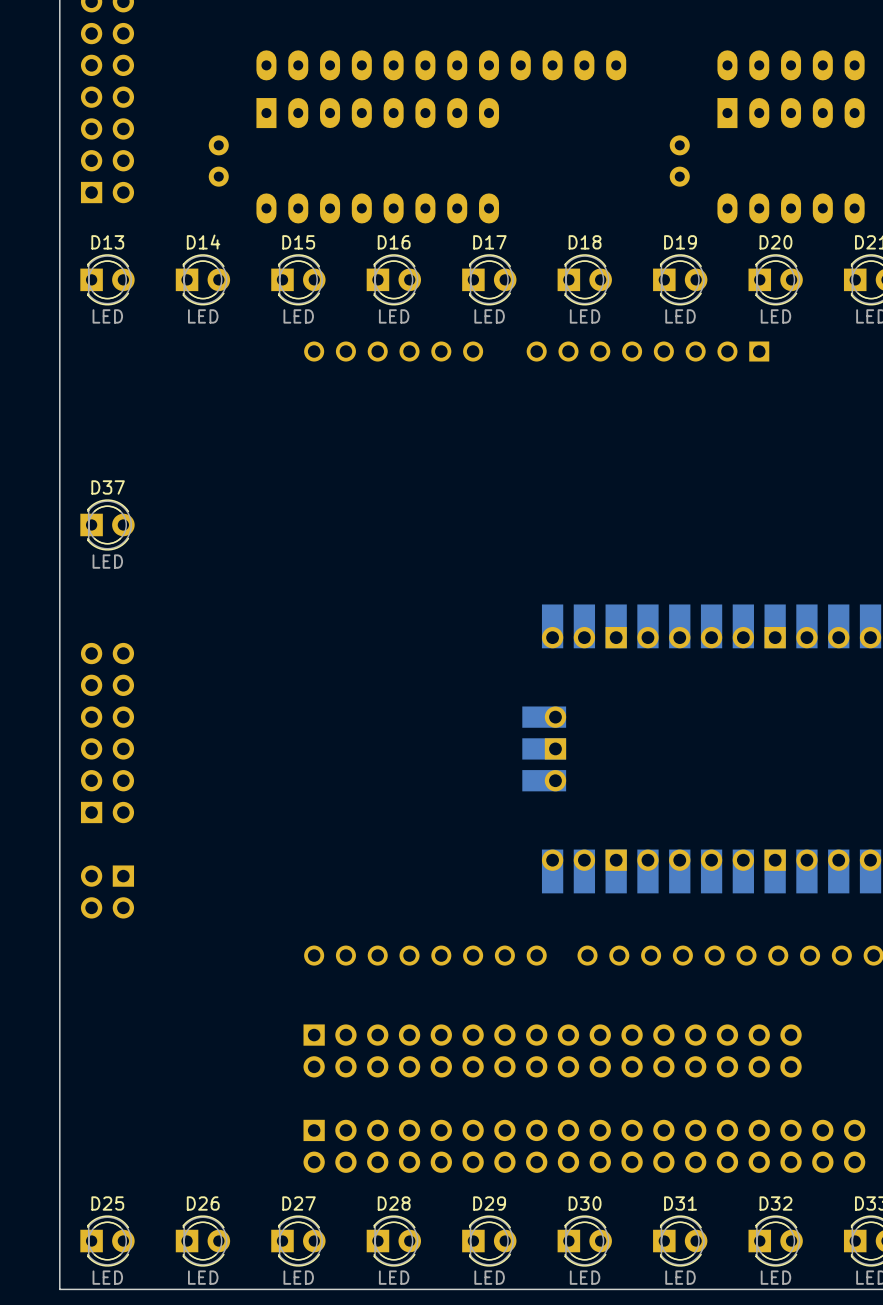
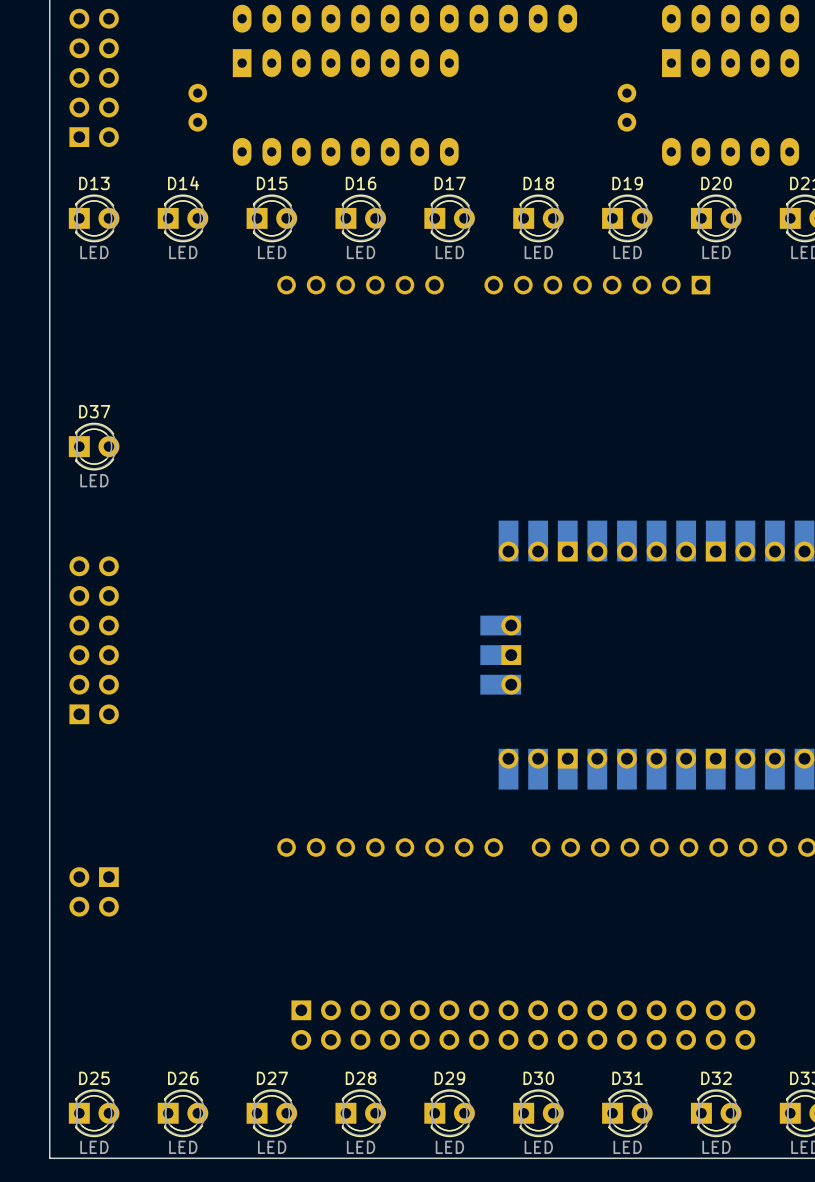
part position: (107, 891) -> (94, 891)
part position: (552, 1050) -> (523, 1025)
part: (584, 1146) -> none

